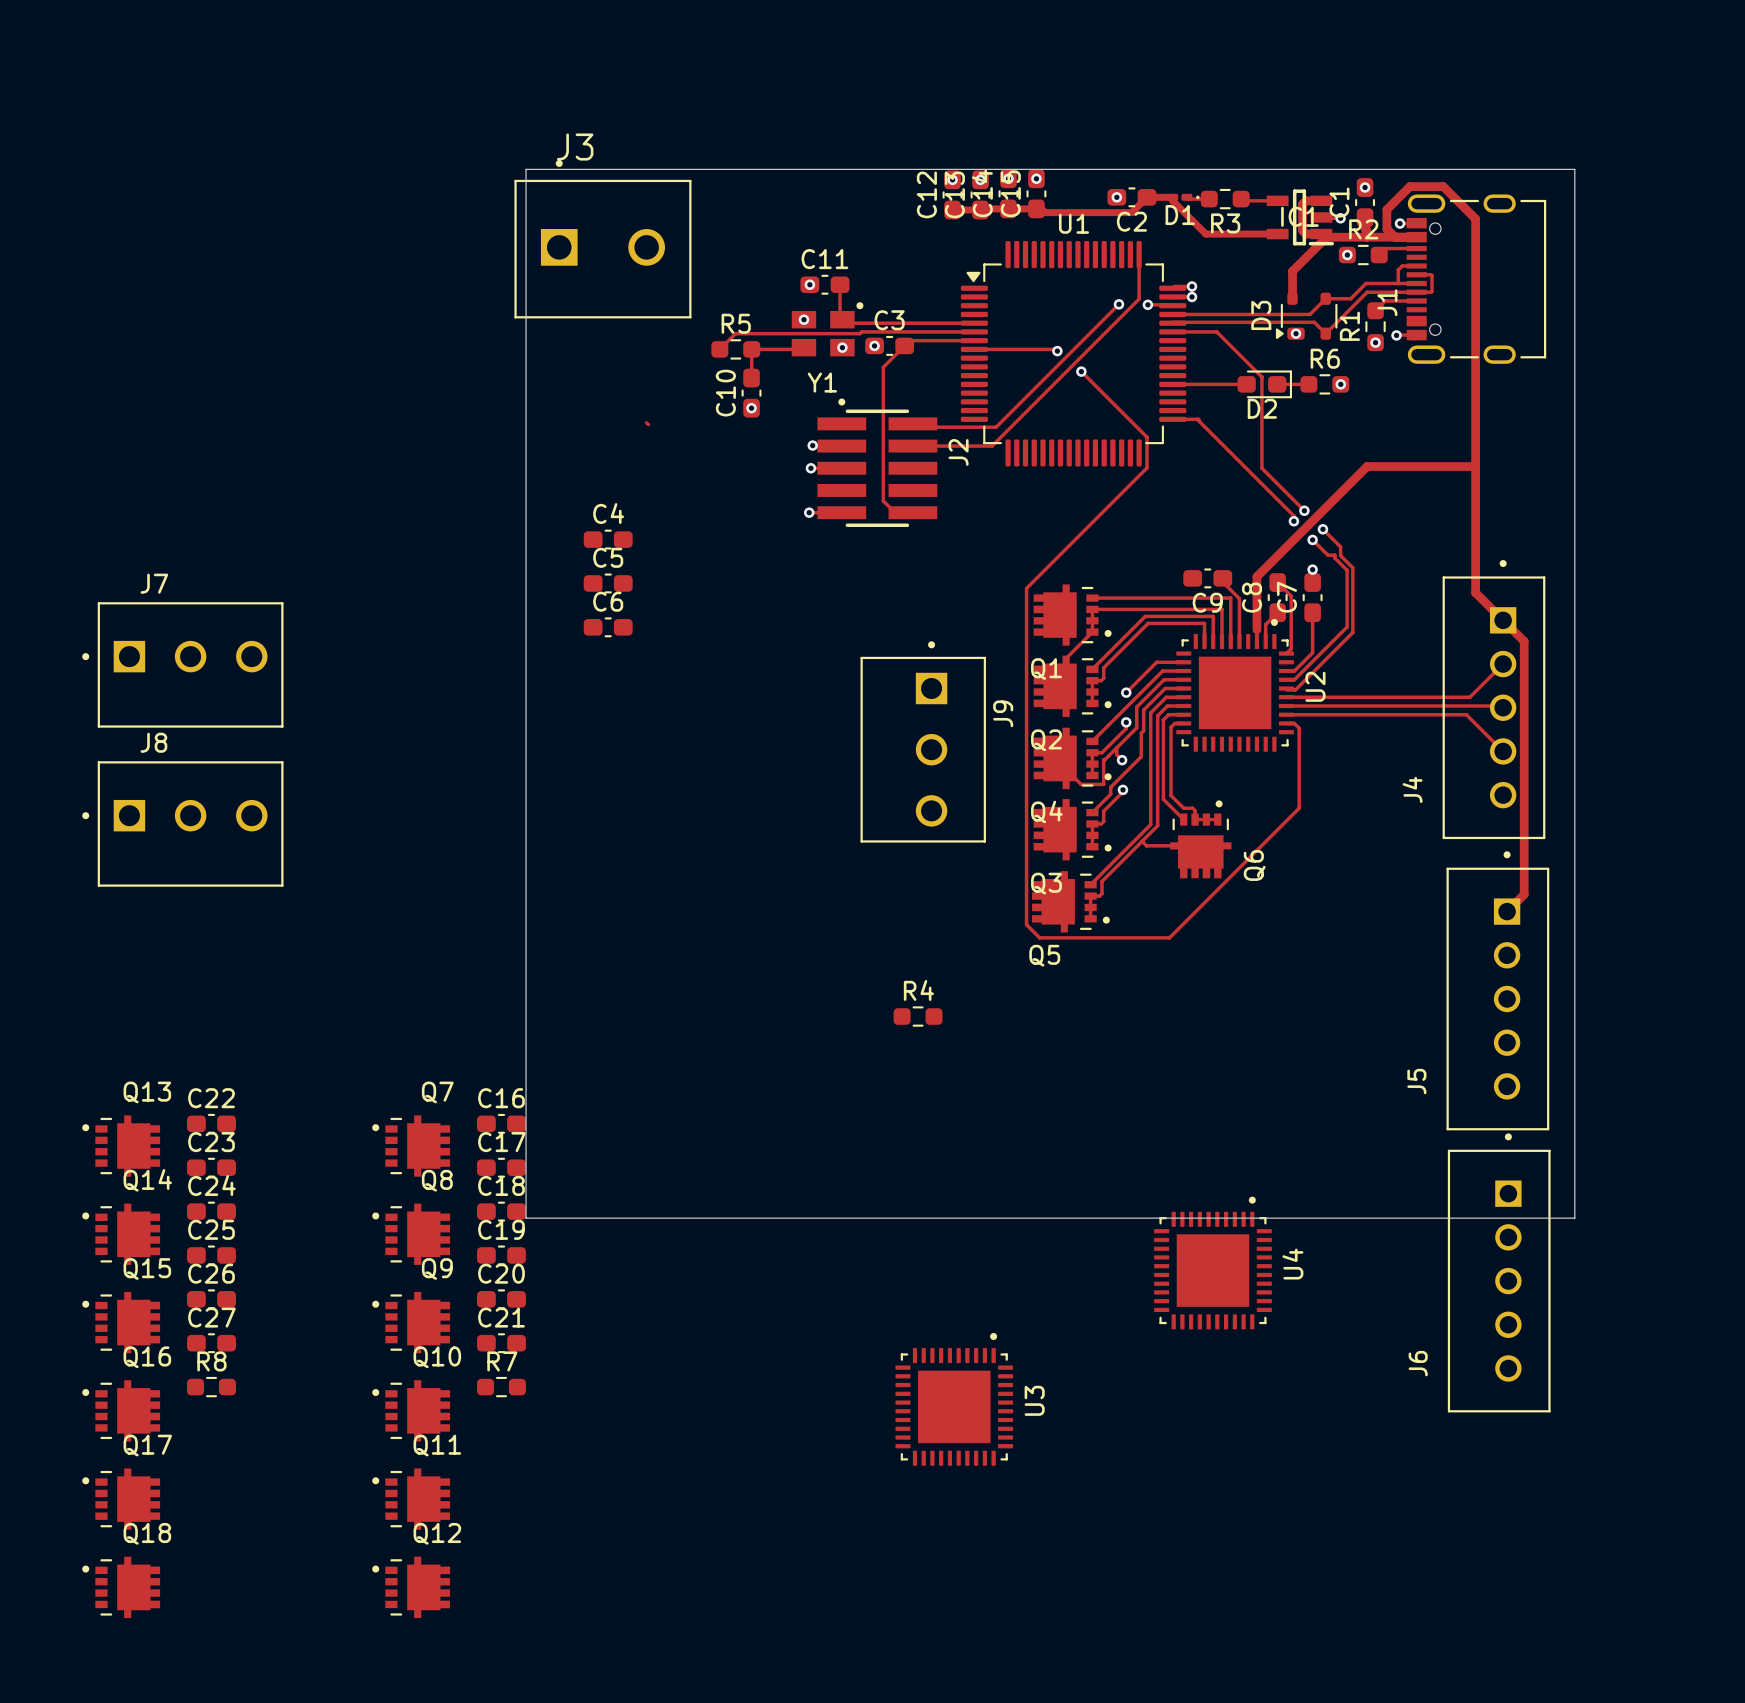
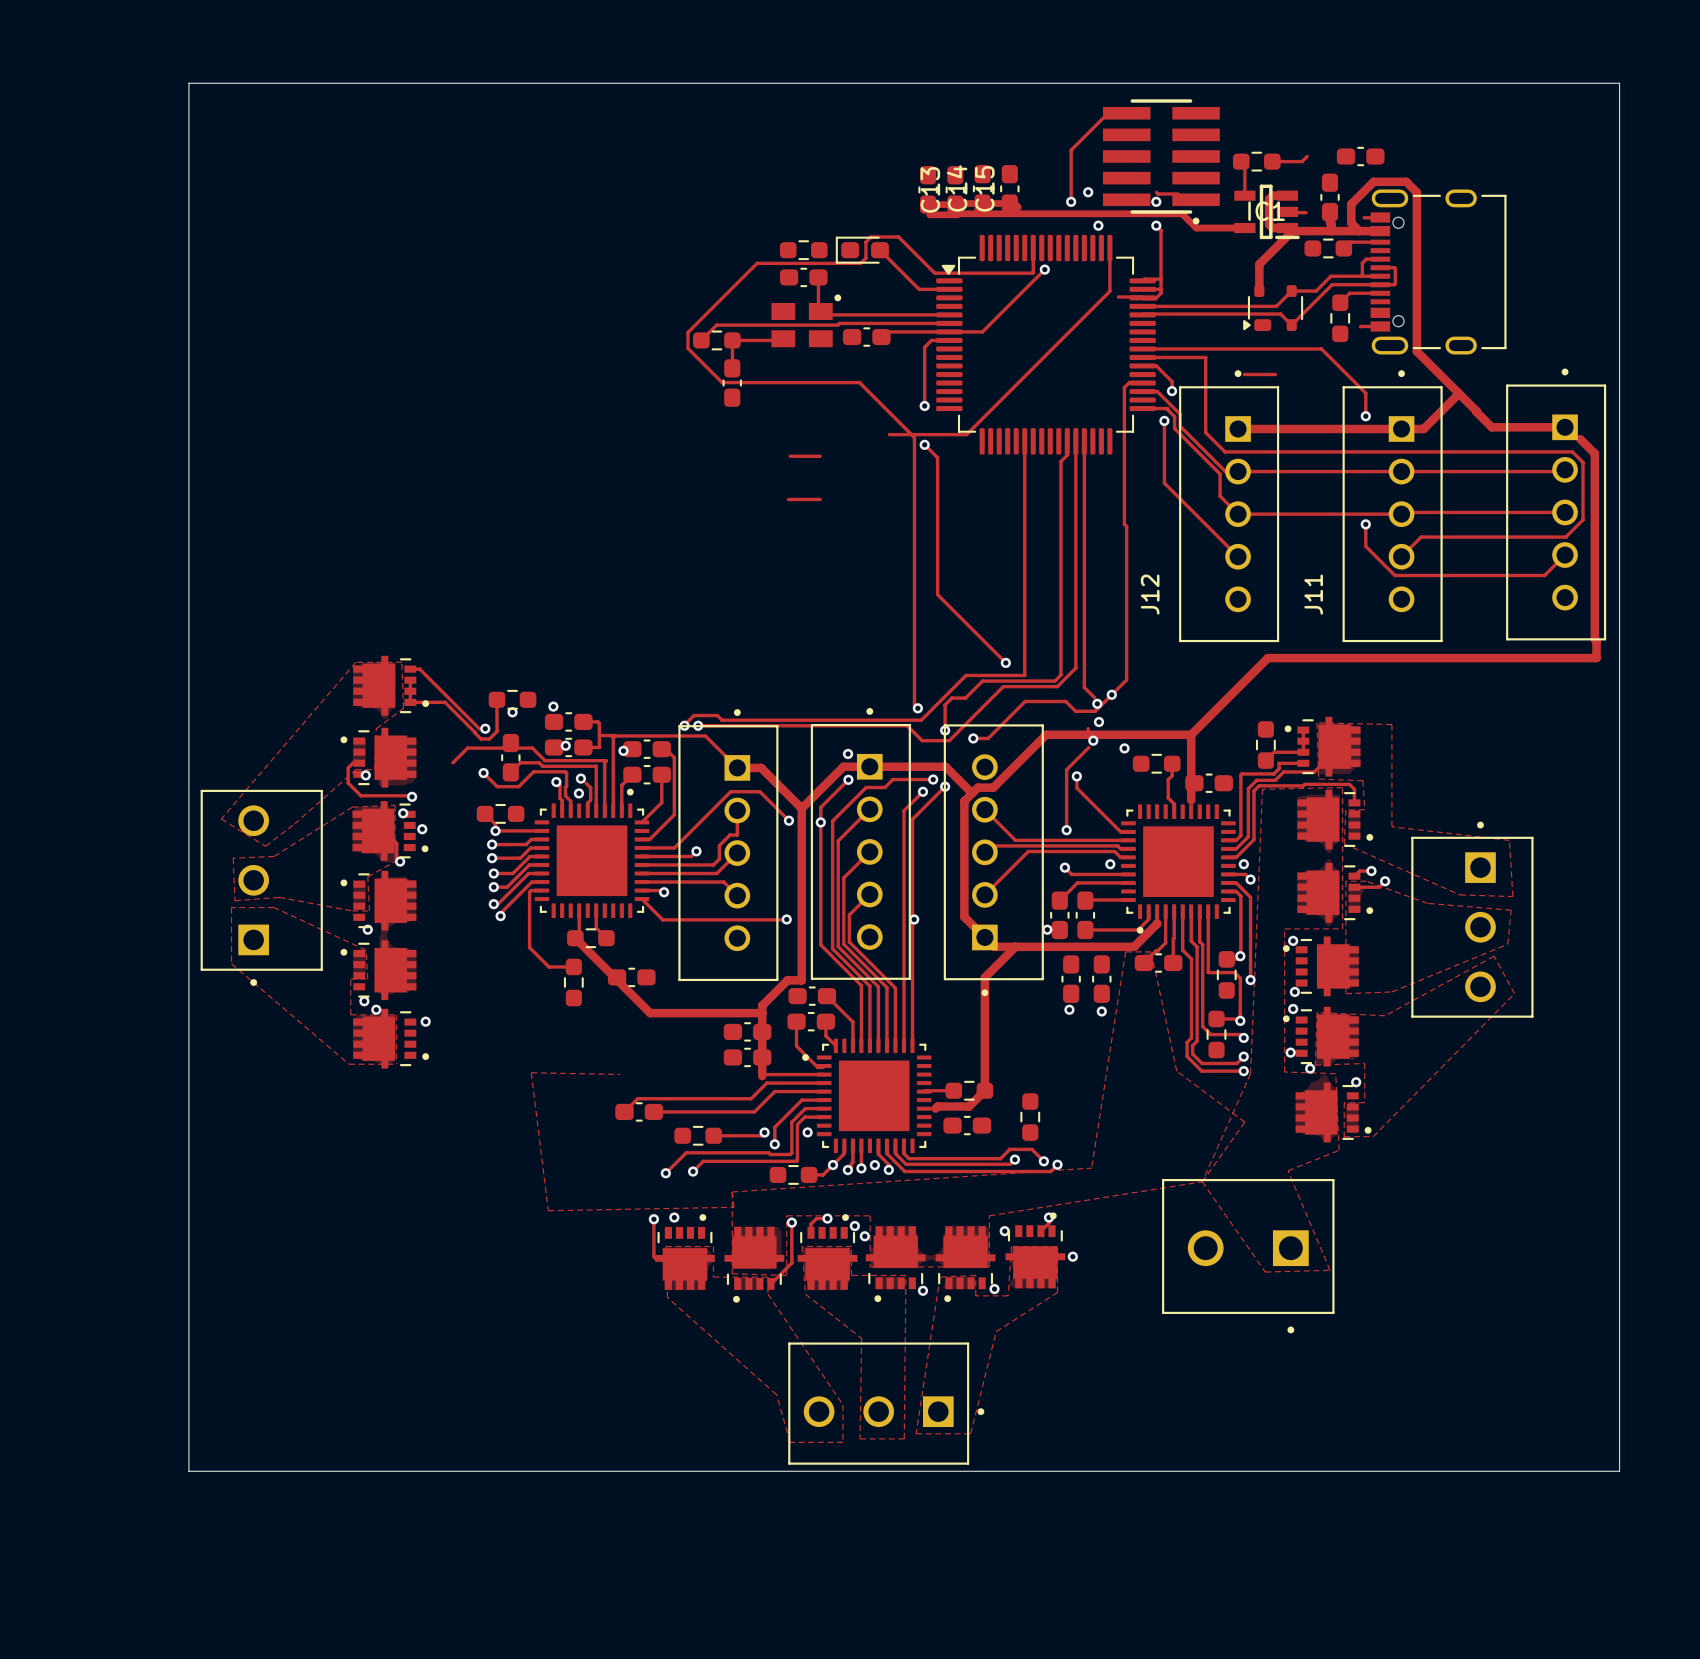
track: none -> (1142, 113) (1108, 113) (1071, 150) (1071, 201)
track: none -> (1307, 156) (1302, 161) (1272, 161)
part: none -> (1360, 156)
part: none -> (1256, 161)
part: none -> (1161, 161)
board edge: (526, 169) (1574, 169) (1574, 1218) (526, 1218) (526, 169) -> (188, 83) (188, 1471) (1619, 1471) (1619, 83) (188, 83)
via: (1008, 178) -> none
via: (1036, 178) -> none
via: (952, 179) -> none
via: (980, 179) -> none
via: (1365, 187) -> none
C12 name: C12 (926, 194) -> none
C2: (1131, 197) -> none
D1: (1183, 197) -> none
track: (1454, 197) (1475, 218) (1475, 592) (1524, 641) (1524, 894) (1507, 911) -> (1416, 192) (1416, 351) (1491, 427) (1565, 427)
R3: (1225, 199) -> none
track: (1241, 199) (1242, 200) (1277, 200) -> (1241, 161) (1244, 165) (1244, 195)
C1 name: C1 (1339, 202) -> none
via: none -> (1071, 201)
via: none -> (1156, 201)
track: (1036, 209) (1040, 212) (1131, 212) (1147, 197) (1172, 197) (1172, 200) (1205, 234) (1227, 234) -> (929, 214) (1182, 213) (1196, 228)
via: (1340, 218) -> none
U1 name: U1 (1074, 223) -> none
via: (1400, 223) -> none
R2 name: R2 (1363, 229) -> none
via: none -> (1098, 225)
track: none -> (1156, 225) (1160, 230) (1160, 293) (1155, 298) (1142, 298)
via: none -> (1156, 225)
J3: (602, 239) -> none
track: none -> (1033, 248) (1033, 273)
via: (1347, 255) -> none
part: none -> (803, 250)
part: none -> (862, 250)
track: none -> (879, 250) (919, 289) (949, 289)
C11 name: C11 (824, 259) -> none
track: none -> (1044, 269) (982, 331) (949, 331)
via: none -> (1044, 269)
track: none -> (1033, 273) (934, 273) (898, 236) (871, 236) (865, 242) (865, 258) (860, 263) (757, 263) (687, 332) (687, 348) (722, 382) (859, 382) (914, 437) (914, 704) (917, 708)
via: (809, 284) -> none
via: (1192, 286) -> none
via: (1192, 296) -> none
J1 name: J1 (1387, 302) -> none
track: (1118, 304) (996, 427) (916, 427) (912, 423) -> none
via: (1118, 304) -> none
via: (1147, 304) -> none
D3 name: D3 (1261, 315) -> none
via: (803, 319) -> none
C3 name: C3 (889, 320) -> none
R5 name: R5 (736, 323) -> none
R1 name: R1 (1349, 326) -> none
track: (1172, 331) (1216, 331) (1261, 377) (1261, 468) (1304, 510) -> none
via: (1296, 333) -> none
via: (1396, 335) -> none
via: (1375, 342) -> none
via: (874, 345) -> none
track: (904, 345) (883, 367) (883, 500) (895, 512) (912, 512) -> none
via: (842, 347) -> none
track: (974, 349) (1055, 349) (1057, 351) -> (949, 340) (931, 340) (924, 347) (924, 406)
via: (1057, 351) -> none
track: none -> (1142, 348) (1321, 348) (1365, 393) (1365, 416)
track: none -> (1142, 357) (1205, 357) (1205, 432) (1225, 451) (1572, 451) (1583, 462) (1583, 519) (1565, 537) (1421, 537) (1401, 556)
track: (1081, 371) (1147, 437) (1147, 467) (1026, 588) (1026, 924) (1039, 937) (1169, 937) (1299, 808) (1299, 728) (1294, 723) (1286, 723) -> none
via: (1081, 371) -> none
track: none -> (1142, 365) (1156, 365) (1172, 381) (1172, 391)
Y1 name: Y1 (822, 382) -> none
track: (1172, 384) (1246, 384) -> none
D2: (1264, 384) -> none
R6: (1324, 384) -> none
via: (1340, 384) -> none
C10 name: C10 (725, 393) -> none
track: none -> (1142, 383) (1128, 383) (1124, 387) (1126, 679) (1095, 711) (1075, 711) (1065, 701) (1025, 701) (988, 738) (973, 738)
track: none -> (1142, 391) (1157, 391) (1180, 414) (1180, 426) (1225, 471) (1563, 471) (1565, 469)
via: none -> (1172, 391)
track: none -> (1459, 393) (1423, 429) (1238, 429)
via: (751, 408) -> none
via: none -> (924, 406)
track: (646, 422) (648, 424) -> none
track: (1205, 427) (1293, 515) (1293, 521) -> (1174, 416) (1174, 428) (1220, 474) (1220, 496) (1238, 514) (1565, 512)
via: none -> (1365, 416)
track: none -> (1164, 420) (1164, 483) (1238, 556)
via: none -> (1164, 420)
via: (812, 445) -> none
track: none -> (1580, 439) (1594, 453) (1594, 639) (1596, 641) (1596, 658) (1267, 658) (1191, 734)
track: none -> (1024, 441) (1024, 675) (966, 675) (921, 720) (722, 720) (717, 715) (693, 715) (684, 725)
track: none -> (1067, 441) (1067, 455) (1060, 461) (1060, 675) (1055, 681) (982, 681) (965, 698) (951, 698) (945, 704) (945, 730)
track: none -> (1075, 441) (1075, 668) (1057, 686) (1003, 686) (949, 740) (922, 740) (907, 725) (698, 725)
track: none -> (1084, 441) (1084, 687) (1094, 697)
track: none -> (924, 444) (937, 457) (937, 594) (1005, 662)
via: none -> (924, 444)
J2: (877, 462) -> none
track: (1475, 466) (1367, 466) (1256, 576) (1256, 629) -> none
via: (810, 468) -> none
via: (1304, 510) -> none
via: (809, 512) -> none
part: none -> (1556, 504)
J12: none -> (1229, 506)
J11: none -> (1392, 506)
via: (1293, 521) -> none
track: (1322, 529) (1340, 546) (1340, 555) (1352, 567) (1352, 632) (1295, 689) (1286, 689) -> none
via: (1322, 529) -> none
track: none -> (1365, 524) (1365, 546) (1394, 575) (1544, 575) (1565, 555)
via: none -> (1365, 524)
C4: (608, 539) -> none
track: (1312, 539) (1327, 555) (1334, 555) (1334, 558) (1347, 570) (1347, 627) (1294, 679) (1286, 679) -> none
via: (1312, 539) -> none
via: (1312, 569) -> none
C9: (1207, 578) -> none
track: (1222, 578) (1222, 582) (1239, 598) (1239, 641) -> none
track: (1277, 582) (1291, 596) (1291, 648) (1286, 653) -> none
C5: (608, 583) -> none
C8: (1277, 597) -> none
C7: (1312, 597) -> none
track: (1092, 598) (1230, 598) (1230, 641) -> none
track: (1277, 612) (1265, 624) (1265, 641) -> none
track: (1312, 612) (1312, 652) (1294, 671) (1286, 671) -> none
Q1: (1072, 615) -> none
C6: (608, 627) -> none
track: (1204, 641) (1204, 623) (1148, 623) (1103, 667) (1103, 678) (1101, 680) (1092, 680) (1092, 703) -> none
track: (1213, 641) (1213, 616) (1145, 616) (1092, 669) -> none
track: (1221, 641) (1221, 609) (1092, 609) (1092, 632) (1066, 658) (1066, 686) -> none
track: (1183, 662) (1156, 662) (1126, 692) -> none
J7: (182, 664) -> none
track: (1503, 664) (1469, 697) (1286, 697) -> none
track: (1183, 671) (1162, 671) (1092, 741) -> none
zone outline: none -> (355, 662) (401, 662) (403, 708) (376, 728) (374, 769) (355, 769) (294, 824) (265, 846) (221, 819) (355, 662)
track: (1183, 679) (1164, 679) (1136, 707) (1136, 727) (1103, 759) (1103, 784) (1081, 784) (1066, 769) (1066, 758) -> none
via: none -> (1005, 662)
U2: (1235, 685) -> none
track: none -> (410, 669) (419, 669) (479, 728) (485, 728)
Q2: (1072, 686) -> none
track: (1183, 688) (1165, 688) (1143, 709) (1141, 756) (1110, 787) (1110, 794) (1092, 812) -> none
via: (1126, 692) -> none
track: (1183, 697) (1166, 697) (1150, 712) (1150, 824) (1090, 884) -> none
track: none -> (410, 680) (410, 702) (445, 702) (481, 738) (489, 738) (497, 731) (497, 699)
J4: (1493, 699) -> none
part: none -> (391, 685)
track: (1183, 705) (1167, 705) (1157, 715) (1157, 825) (1101, 881) (1101, 893) (1099, 896) (1090, 896) (1090, 918) -> none
track: (1286, 705) (1501, 705) (1503, 707) -> none
via: none -> (1111, 694)
track: (1183, 714) (1168, 714) (1163, 719) (1163, 799) (1183, 819) -> none
track: (1286, 714) (1466, 714) (1503, 751) -> none
part: none -> (512, 699)
track: (1126, 722) (1126, 728) (1101, 752) (1092, 752) (1092, 775) -> none
track: (1183, 723) (1174, 723) (1171, 727) (1171, 795) (1183, 808) (1192, 808) (1195, 810) (1195, 819) (1217, 819) -> none
via: none -> (553, 706)
via: none -> (917, 708)
via: none -> (512, 712)
part: none -> (568, 721)
track: none -> (583, 721) (597, 721) (599, 723) (599, 747) (583, 747)
J9: (923, 741) -> none
via: none -> (1099, 722)
zone outline: none -> (1316, 722) (1391, 724) (1391, 826) (1509, 840) (1512, 896) (1460, 894) (1344, 843) (1345, 809) (1364, 809) (1362, 780) (1318, 779) (1316, 722)
via: none -> (684, 725)
via: none -> (698, 725)
via: none -> (485, 728)
via: none -> (945, 730)
track: none -> (1303, 730) (1303, 752) (1274, 752) (1265, 760)
track: none -> (599, 735) (705, 735) (737, 767) (761, 767) (801, 808)
track: none -> (611, 735) (613, 737) (613, 810)
track: none -> (1191, 734) (1191, 800)
track: none -> (1191, 734) (1046, 734) (993, 787) (977, 787) (964, 801) (964, 916) (994, 946) (1134, 946) (1157, 923)
via: none -> (973, 738)
Q4: (1072, 758) -> none
part: none -> (1265, 745)
via: none -> (565, 745)
part: none -> (1322, 746)
track: none -> (1328, 746) (1328, 757) (1314, 772) (1283, 772) (1275, 780) (1256, 780) (1248, 788) (1248, 836) (1236, 848) (1228, 848)
part: none -> (568, 747)
track: none -> (1088, 747) (1066, 769) (1066, 830)
part: none -> (647, 749)
track: none -> (665, 749) (674, 757) (674, 814) (649, 839) (641, 839)
via: none -> (1124, 748)
via: none -> (623, 750)
via: none -> (848, 753)
part: none -> (378, 757)
part: none -> (510, 757)
track: none -> (452, 762) (467, 748) (532, 748) (545, 760) (605, 760) (604, 810)
track: none -> (359, 763) (352, 763) (348, 767) (348, 782) (360, 795) (412, 796)
part: none -> (1156, 763)
track: none -> (1172, 763) (1172, 775) (1168, 779) (1168, 797) (1174, 803) (1174, 811)
track: none -> (1303, 763) (1279, 763) (1279, 768) (1273, 773) (1240, 775) (1240, 835) (1236, 840) (1228, 840)
track: (1122, 789) (1103, 811) (1103, 821) (1101, 823) (1092, 823) (1092, 846) -> none
via: (1122, 789) -> none
track: none -> (510, 772) (520, 762) (539, 762) (542, 766) (596, 766) (596, 810)
track: none -> (483, 773) (497, 786) (518, 786) (533, 771) (565, 771) (565, 796) (570, 801) (570, 810)
via: none -> (483, 773)
via: none -> (365, 775)
track: none -> (632, 774) (621, 785) (621, 810)
part: none -> (647, 774)
track: none -> (661, 774) (661, 802) (641, 822)
track: none -> (1076, 776) (1076, 788) (1120, 831) (1128, 831)
via: none -> (1076, 776)
via: none -> (580, 778)
track: none -> (848, 779) (820, 807) (820, 944) (861, 985) (861, 1045)
via: none -> (848, 779)
track: none -> (933, 779) (892, 779) (884, 787) (866, 787) (832, 821) (832, 948) (869, 986) (869, 1045)
via: none -> (933, 779)
track: none -> (556, 782) (559, 785) (562, 810)
via: none -> (556, 782)
track: none -> (586, 783) (590, 787) (590, 800) (587, 802) (587, 810)
part: none -> (1209, 783)
track: none -> (945, 786) (912, 819) (912, 1045)
via: none -> (945, 786)
track: none -> (922, 791) (903, 810) (903, 1045)
via: none -> (922, 791)
via: none -> (578, 793)
track: none -> (972, 793) (945, 766) (843, 766) (801, 808)
via: none -> (412, 796)
J8: (182, 823) -> none
track: none -> (1354, 802) (1354, 789) (1349, 784) (1259, 785) (1253, 790) (1253, 839) (1236, 857) (1228, 857)
zone outline: none -> (395, 805) (352, 807) (274, 856) (233, 858) (234, 900) (279, 897) (352, 910) (369, 910) (367, 876) (395, 861) (395, 805)
track: none -> (801, 808) (801, 980) (787, 980) (762, 1005) (762, 1076) (763, 1074) (824, 1074)
Q3: (1072, 829) -> none
track: none -> (869, 809) (838, 840) (838, 946) (878, 986) (878, 1045)
track: none -> (737, 810) (737, 835) (729, 835) (719, 845) (719, 859) (713, 864) (641, 864)
track: none -> (984, 809) (1015, 840) (1128, 840)
via: none -> (403, 813)
track: none -> (485, 813) (495, 824) (495, 830) (542, 830)
part: none -> (500, 813)
Q6: (1200, 839) -> none
track: (1142, 841) (1146, 845) (1200, 845) -> none
part: none -> (1335, 819)
track: none -> (788, 820) (760, 791) (730, 791) (674, 847) (641, 847)
via: none -> (788, 820)
via: none -> (820, 822)
via: none -> (422, 829)
track: none -> (384, 830) (396, 843) (396, 858) (400, 861)
part: none -> (390, 830)
via: none -> (495, 830)
via: none -> (1066, 830)
track: none -> (542, 839) (531, 839) (526, 844) (492, 844)
via: none -> (492, 844)
part: none -> (860, 843)
part: none -> (728, 845)
track: none -> (542, 847) (530, 847) (520, 858) (492, 858)
track: none -> (1128, 848) (1120, 848) (1117, 845) (991, 845) (984, 852)
track: none -> (696, 851) (691, 856) (641, 856)
via: none -> (696, 851)
track: none -> (869, 851) (843, 877) (843, 944) (886, 987) (886, 1045)
part: none -> (591, 853)
track: none -> (737, 853) (716, 873) (641, 873)
track: none -> (542, 856) (529, 856) (512, 873) (493, 873)
via: none -> (492, 858)
track: none -> (1128, 857) (1120, 857) (1114, 851) (1028, 851) (984, 894)
part: none -> (993, 860)
via: none -> (400, 861)
via: none -> (1110, 864)
via: none -> (1243, 864)
track: none -> (542, 864) (529, 864) (507, 887) (493, 887)
track: none -> (1064, 867) (1071, 874) (1128, 874)
via: none -> (1064, 867)
part: none -> (1178, 869)
track: none -> (1371, 871) (1359, 871) (1354, 876)
via: none -> (1371, 871)
via: none -> (493, 873)
track: none -> (542, 873) (528, 873) (498, 904) (493, 904)
track: none -> (1228, 874) (1245, 874) (1250, 879)
Q5: (1070, 901) -> none
via: none -> (1250, 879)
zone outline: none -> (1345, 881) (1345, 993) (1391, 991) (1507, 944) (1511, 910) (1427, 903) (1366, 881) (1345, 881)
track: none -> (1385, 881) (1379, 887) (1354, 887)
via: none -> (1385, 881)
track: none -> (542, 882) (531, 882) (500, 913) (500, 916)
track: none -> (641, 882) (723, 882) (737, 895)
track: none -> (1128, 882) (1077, 882) (1059, 900)
track: none -> (1228, 882) (1236, 882) (1250, 897) (1250, 980)
via: none -> (493, 887)
part: none -> (261, 887)
track: none -> (542, 890) (529, 892) (529, 947) (548, 966) (573, 966)
track: none -> (641, 890) (662, 890) (664, 892)
track: none -> (1228, 891) (1236, 891) (1240, 896) (1240, 955) (1237, 959) (1226, 959)
via: none -> (664, 892)
part: none -> (1335, 892)
track: none -> (869, 894) (849, 914) (849, 942) (895, 988) (895, 1045)
track: none -> (641, 899) (662, 919) (786, 919)
track: none -> (1084, 899) (1128, 899)
part: none -> (378, 900)
via: none -> (493, 904)
zone outline: none -> (231, 907) (274, 907) (366, 950) (367, 979) (350, 979) (350, 1014) (396, 1014) (396, 1064) (349, 1064) (231, 963) (231, 907)
track: none -> (579, 910) (579, 934) (575, 938) (650, 1013) (762, 1013)
track: none -> (596, 910) (596, 928) (606, 938)
track: none -> (1148, 911) (1148, 919) (1138, 930) (1083, 930)
track: none -> (1165, 911) (1165, 942) (1143, 963)
track: none -> (1174, 911) (1173, 963)
track: none -> (1182, 911) (1182, 950) (1191, 959) (1191, 1037) (1187, 1042) (1187, 1056) (1201, 1071) (1243, 1071)
track: none -> (1191, 911) (1191, 941) (1197, 946) (1197, 1041) (1192, 1045) (1192, 1054) (1202, 1063) (1236, 1063) (1243, 1056)
track: none -> (1199, 911) (1199, 941) (1202, 944) (1202, 1026) (1210, 1034) (1240, 1034) (1243, 1037)
track: none -> (1208, 911) (1208, 972) (1234, 972) (1240, 978) (1240, 1020)
part: none -> (1059, 915)
part: none -> (1085, 915)
via: none -> (500, 916)
via: none -> (786, 919)
via: none -> (914, 919)
part: none -> (1472, 919)
via: none -> (367, 929)
via: none -> (1047, 929)
part: none -> (590, 938)
via: none -> (1293, 940)
track: none -> (1015, 946) (984, 977) (984, 1090) (969, 1106) (937, 1106) (935, 1108)
via: none -> (1240, 956)
zone outline: none -> (1494, 956) (1514, 993) (1373, 1136) (1344, 1136) (1344, 1102) (1364, 1102) (1364, 1063) (1315, 1065) (1316, 1012) (1385, 1015) (1494, 956)
part: none -> (1158, 963)
J5: (1497, 990) -> none
part: none -> (1320, 966)
part: none -> (378, 970)
part: none -> (1226, 974)
part: none -> (631, 977)
part: none -> (1071, 979)
part: none -> (1101, 979)
via: none -> (1250, 980)
part: none -> (573, 982)
R4: (918, 1016) -> none
via: none -> (1294, 991)
part: none -> (812, 996)
track: none -> (826, 996) (852, 1022) (852, 1045)
via: none -> (364, 1001)
via: none -> (1293, 1008)
via: none -> (376, 1009)
via: none -> (1069, 1009)
via: none -> (1101, 1011)
track: none -> (1216, 1018) (1240, 1018)
via: none -> (1240, 1020)
via: none -> (425, 1021)
track: none -> (796, 1021) (796, 1046) (817, 1067) (824, 1066)
part: none -> (811, 1021)
track: none -> (825, 1021) (825, 1035) (835, 1045)
part: none -> (747, 1031)
part: none -> (1216, 1034)
part: none -> (1320, 1036)
via: none -> (1243, 1037)
part: none -> (391, 1038)
via: none -> (1290, 1052)
via: none -> (1243, 1056)
part: none -> (747, 1057)
via: none -> (1310, 1068)
via: none -> (1243, 1071)
zone outline: none -> (619, 1074) (531, 1072) (548, 1210) (733, 1207) (732, 1191)
via: none -> (1356, 1082)
track: none -> (824, 1083) (766, 1083) (751, 1098) (637, 1098) (624, 1111)
track: none -> (953, 1090) (924, 1091)
part: none -> (969, 1090)
track: none -> (824, 1091) (774, 1091) (754, 1111) (653, 1111)
C22: (211, 1123) -> none
C16: (501, 1123) -> none
part: none -> (866, 1095)
track: none -> (824, 1100) (801, 1100) (774, 1127) (774, 1144)
track: none -> (824, 1108) (805, 1108) (791, 1122) (791, 1152) (790, 1154) (686, 1152) (665, 1173)
part: none -> (639, 1111)
part: none -> (1333, 1112)
Q13: (121, 1146) -> none
Q7: (411, 1146) -> none
track: none -> (824, 1117) (804, 1117) (797, 1124) (796, 1161) (703, 1161) (693, 1171)
part: none -> (1030, 1117)
part: none -> (967, 1125)
track: none -> (764, 1132) (761, 1135) (713, 1135)
via: none -> (764, 1132)
via: none -> (807, 1132)
part: none -> (698, 1135)
C23: (211, 1167) -> none
C17: (501, 1167) -> none
via: none -> (774, 1144)
track: none -> (844, 1145) (844, 1153) (823, 1174) (809, 1174)
track: none -> (852, 1145) (852, 1162) (847, 1170)
track: none -> (861, 1145) (861, 1168)
track: none -> (878, 1145) (878, 1154) (888, 1164) (888, 1169)
track: none -> (886, 1145) (886, 1153) (904, 1171) (1050, 1171) (1057, 1164)
track: none -> (895, 1145) (895, 1153) (906, 1164) (1010, 1164) (1014, 1159)
track: none -> (903, 1145) (903, 1153) (909, 1158) (1000, 1158) (1009, 1149) (1031, 1149) (1043, 1161)
via: none -> (1014, 1159)
via: none -> (1043, 1161)
via: none -> (833, 1165)
via: none -> (874, 1165)
via: none -> (1057, 1164)
via: none -> (861, 1168)
via: none -> (847, 1170)
via: none -> (888, 1169)
via: none -> (693, 1171)
via: none -> (665, 1173)
part: none -> (793, 1174)
C24: (211, 1211) -> none
C18: (501, 1211) -> none
zone outline: none -> (1202, 1181) (1250, 1073) (1262, 789) (1342, 787) (1342, 928) (1284, 928) (1284, 1072) (1335, 1073) (1339, 1150) (1288, 1170) (1330, 1270) (1265, 1272) (1202, 1181)
zone outline: none -> (1202, 1181) (989, 1215) (989, 1266) (870, 1266) (870, 1215) (786, 1215) (786, 1275) (732, 1273) (732, 1191)
zone outline: none -> (1202, 1181) (1244, 1122) (1176, 1071) (1151, 951) (1125, 951) (1091, 1168) (732, 1191)
Q14: (121, 1234) -> none
Q8: (411, 1234) -> none
via: none -> (674, 1217)
track: none -> (1049, 1217) (1049, 1223) (1040, 1231)
via: none -> (1049, 1217)
track: none -> (827, 1218) (816, 1218) (811, 1224) (811, 1232)
via: none -> (827, 1218)
track: none -> (653, 1219) (653, 1256) (655, 1258) (684, 1258)
via: none -> (653, 1219)
track: none -> (791, 1222) (791, 1263) (770, 1283)
via: none -> (791, 1222)
C25: (211, 1255) -> none
C19: (501, 1255) -> none
via: none -> (854, 1226)
via: none -> (1004, 1231)
U4: (1212, 1263) -> none
via: none -> (864, 1236)
J6: (1499, 1272) -> none
zone outline: none -> (665, 1246) (713, 1246) (713, 1277) (768, 1277) (768, 1294) (842, 1404) (842, 1442) (790, 1442) (776, 1394) (667, 1297) (665, 1246)
zone outline: none -> (802, 1246) (851, 1246) (851, 1275) (905, 1275) (904, 1438) (859, 1438) (861, 1338) (805, 1294) (802, 1246)
zone outline: none -> (1011, 1246) (1057, 1246) (1057, 1292) (996, 1331) (970, 1433) (916, 1433) (940, 1277) (975, 1275) (975, 1295) (1008, 1295) (1011, 1246)
part: none -> (1035, 1250)
part: none -> (684, 1252)
part: none -> (827, 1252)
via: none -> (1072, 1256)
part: none -> (1248, 1256)
part: none -> (895, 1264)
part: none -> (965, 1264)
part: none -> (754, 1264)
C26: (211, 1299) -> none
C20: (501, 1299) -> none
Q15: (121, 1322) -> none
Q9: (411, 1322) -> none
via: none -> (994, 1289)
via: none -> (922, 1290)
C27: (211, 1343) -> none
C21: (501, 1343) -> none
R8: (211, 1387) -> none
R7: (501, 1387) -> none
U3: (954, 1399) -> none
Q16: (121, 1410) -> none
Q10: (411, 1410) -> none
part: none -> (886, 1403)
Q17: (121, 1499) -> none
Q11: (411, 1499) -> none
Q18: (121, 1587) -> none
Q12: (411, 1587) -> none

